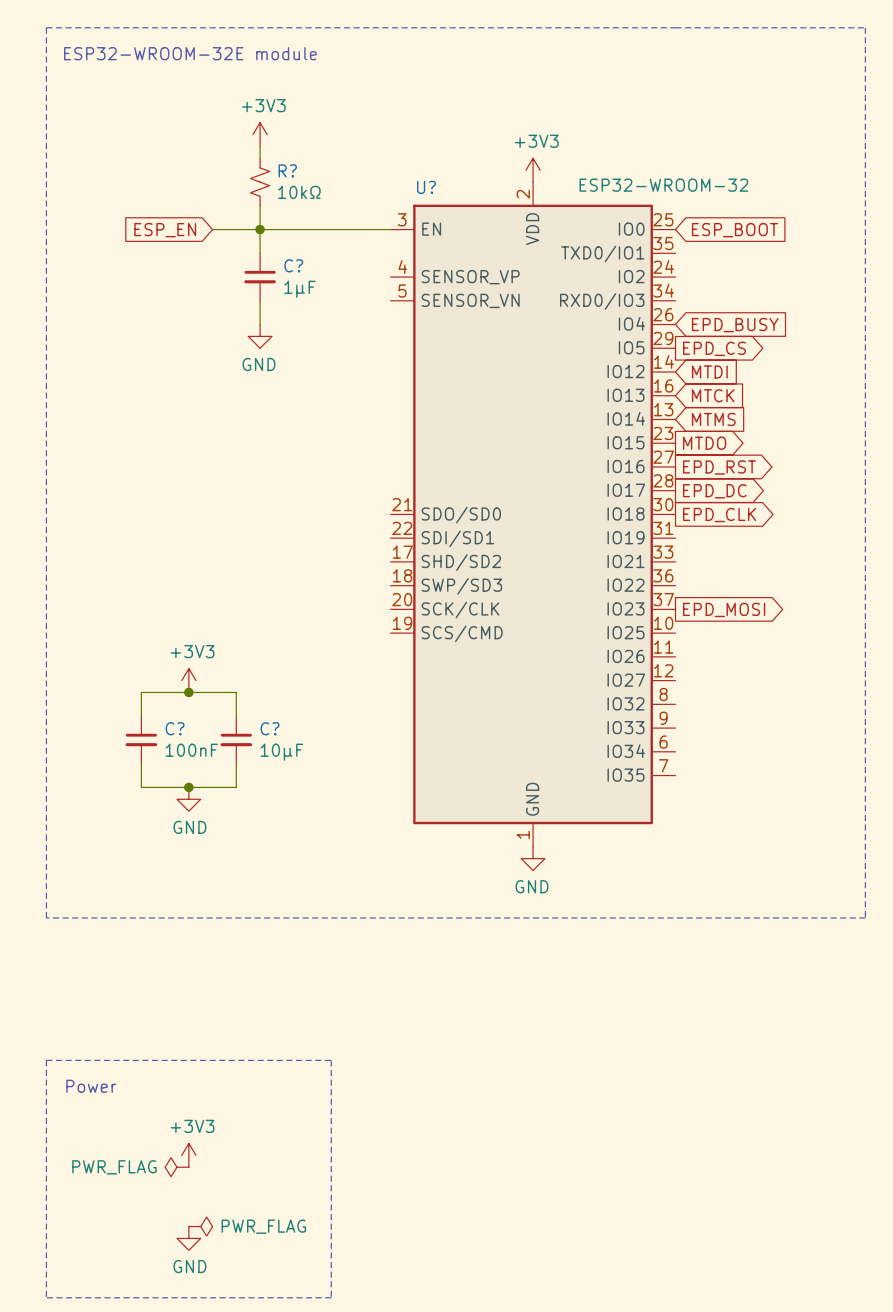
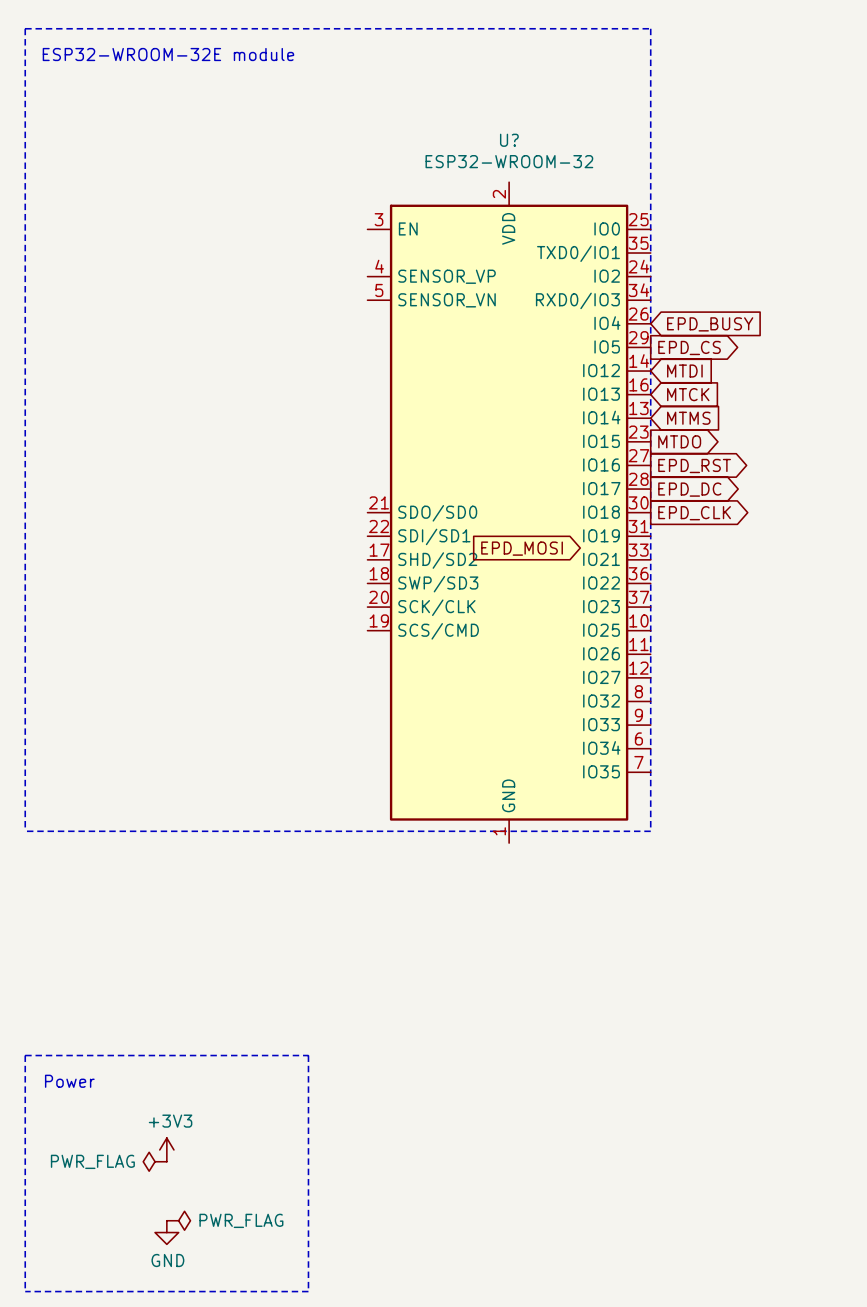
line: (675, 27) (865, 27) (865, 917) (46, 917) (46, 834) -> (650, 28) (650, 831) (25, 831)
power symbol: +3V3 (260, 134) -> none
wire: (260, 146) (260, 158) -> none
power symbol: +3V3 (533, 170) -> none
R?: 10kΩ (260, 182) -> none
U? value position: ESP32-WROOM-32 (663, 185) -> ESP32-WROOM-32 (509, 161)
U? name position: U? (426, 187) -> U? (509, 140)
wire: (260, 205) (260, 253) -> none
wire: (212, 229) (390, 229) -> none
junction: (260, 229) -> none
global label: ESP_EN (165, 230) -> none
global label: ESP_BOOT (734, 230) -> none
C?: 1µF (260, 277) -> none
wire: (260, 300) (260, 324) -> none
power symbol: GND (260, 336) -> none
global label position: EPD_MOSI (724, 609) -> EPD_MOSI (522, 548)
power symbol: +3V3 (188, 680) -> none
junction: (188, 692) -> none
wire: (141, 716) (141, 692) (236, 692) (236, 716) -> none
C?: 100nF (141, 739) -> none
C?: 10µF (236, 739) -> none
wire: (141, 763) (141, 787) (236, 787) (236, 763) -> none
junction: (188, 787) -> none
power symbol: GND (188, 799) -> none
power symbol: GND (533, 858) -> none

